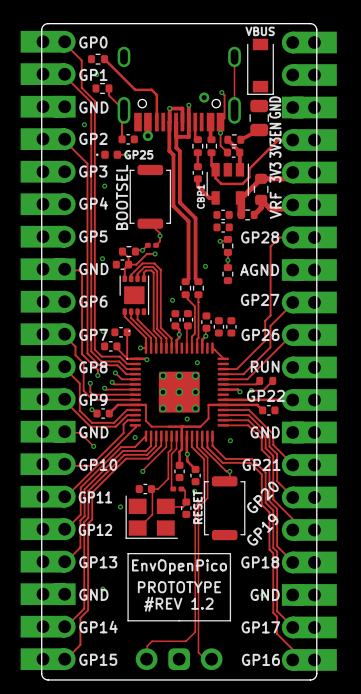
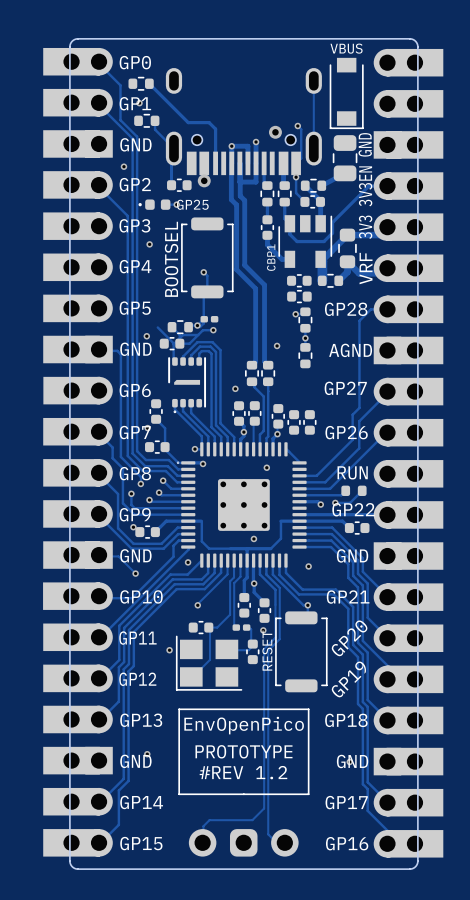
track: none -> (203, 272) (207, 275) (207, 291) (203, 295) (203, 323) (200, 327)
track: (150, 223) (160, 233) (160, 241) (156, 245) -> none
via position: (160, 235) -> (203, 272)
track: none -> (198, 335) (182, 335) (173, 344)
track: (128, 264) (124, 268) (124, 278) -> (157, 327) (173, 343) (174, 361)
part footprint: [119, 275, 150, 316] -> [168, 357, 207, 408]
track: none -> (156, 419) (165, 428) (165, 447)
drawing position: (129, 331) -> (174, 411)
part rotation: 0° (121, 332) -> 90° clockwise (156, 411)
part position: (121, 332) -> (156, 411)
track: (127, 332) (127, 358) -> none

